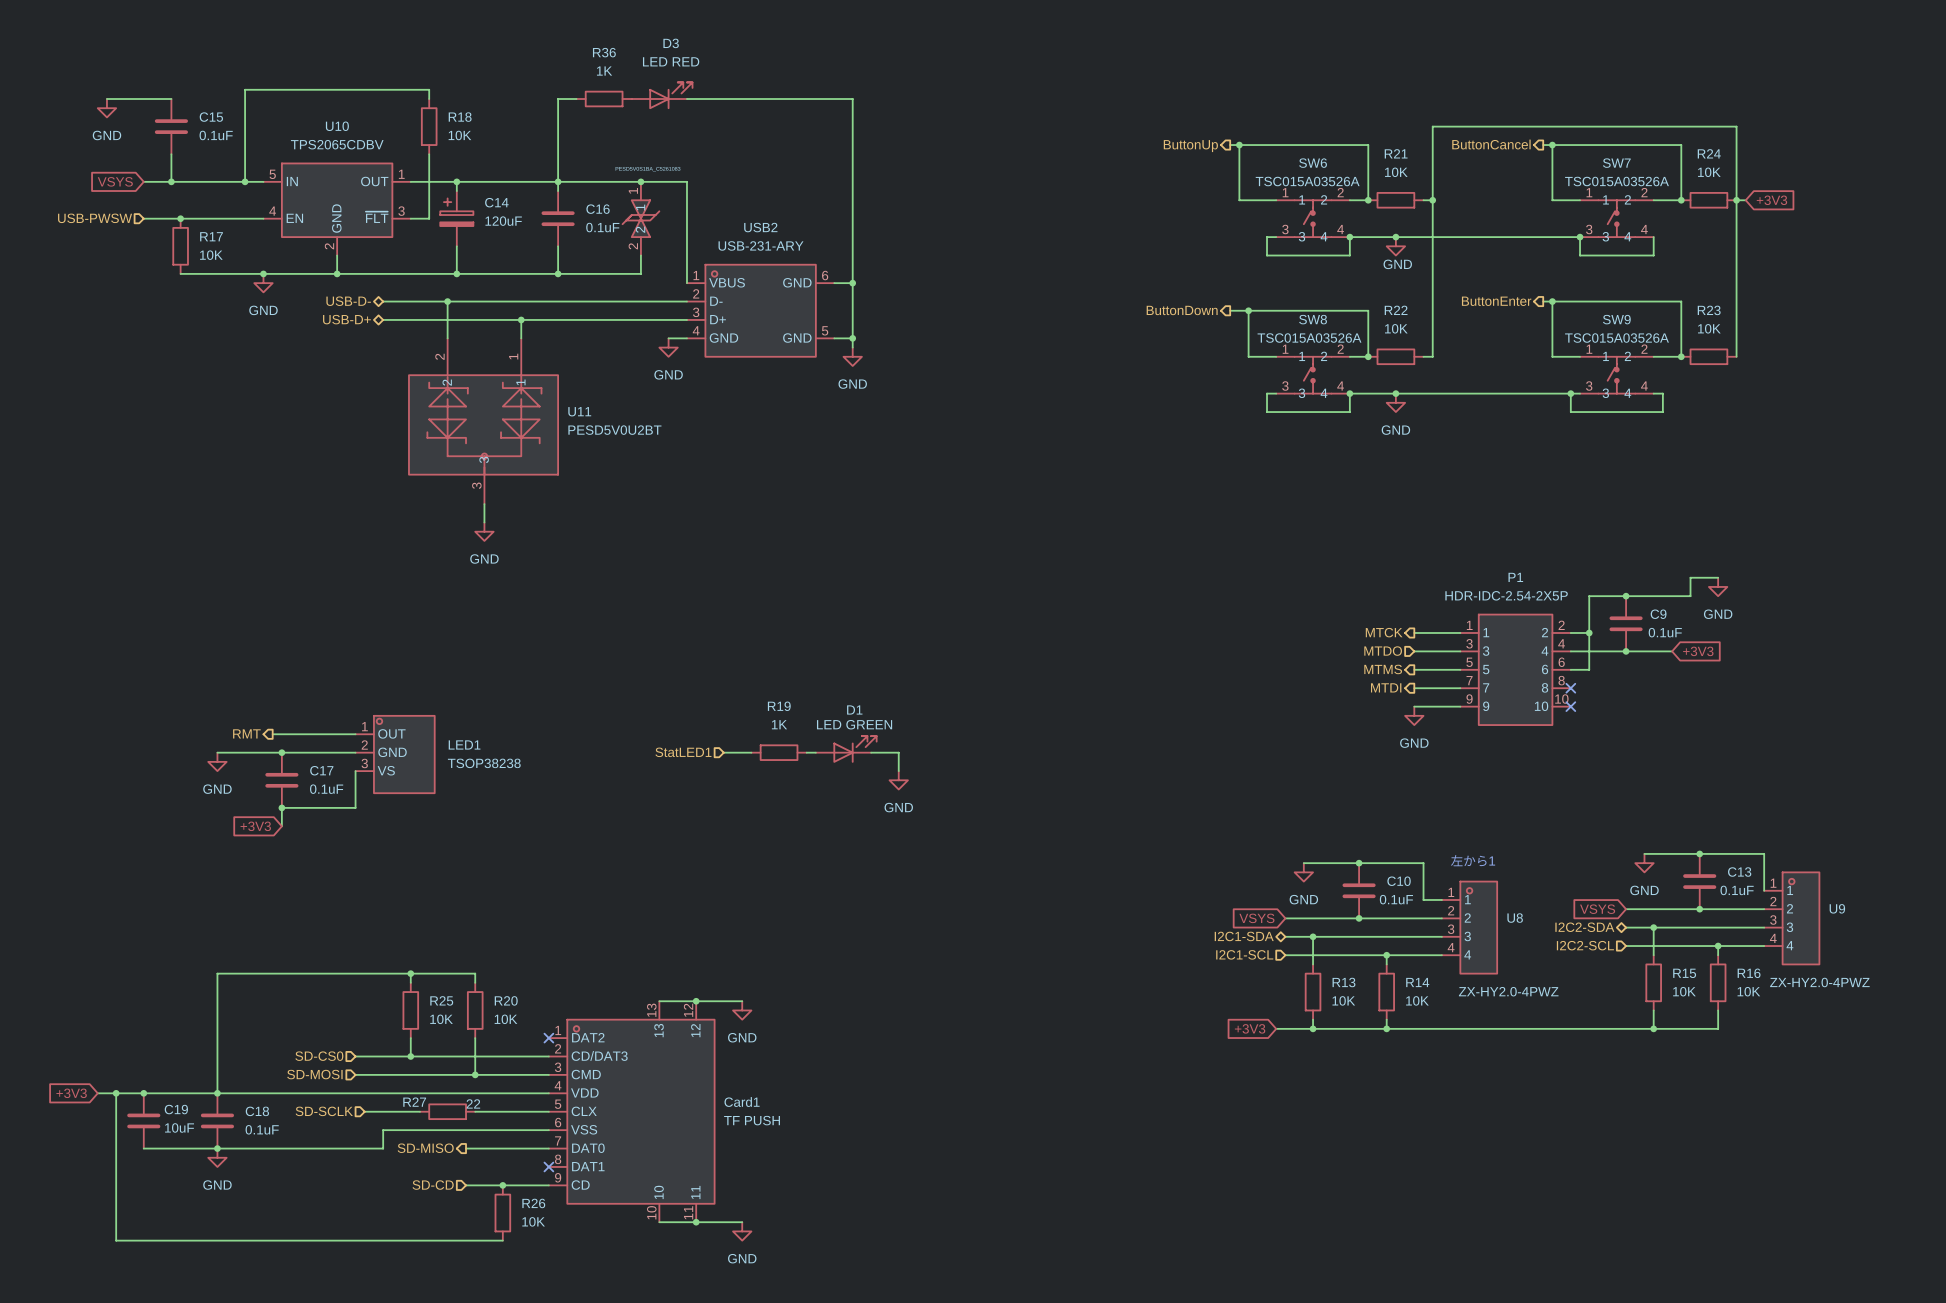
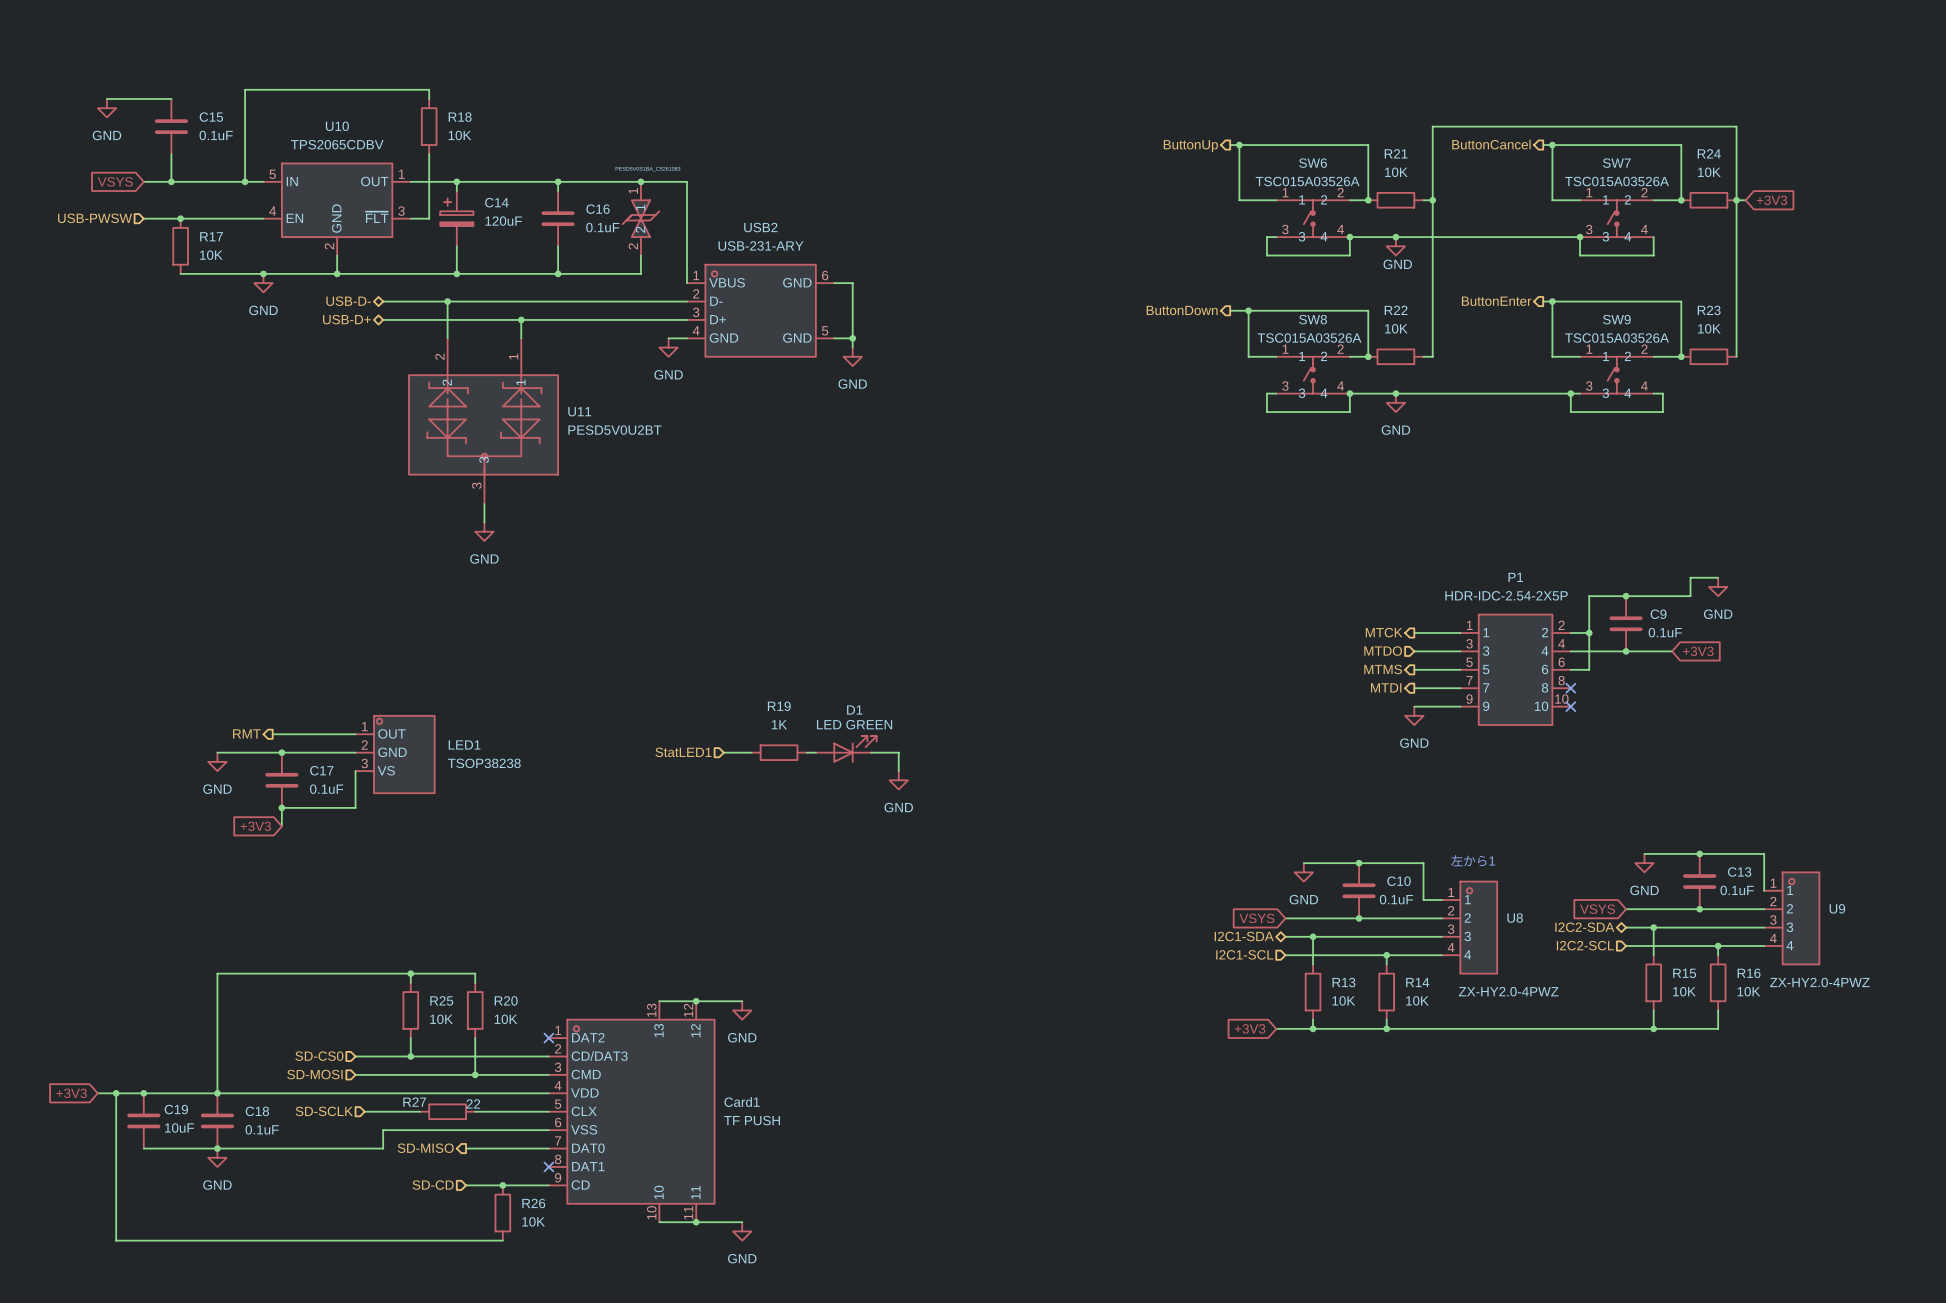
D3: LED RED (662, 95) -> none
wire: (576, 99) (558, 99) (558, 181) -> none
R36: 1K (604, 99) -> none
wire: (686, 99) (852, 99) (852, 283) -> none
junction: (852, 283) -> none

